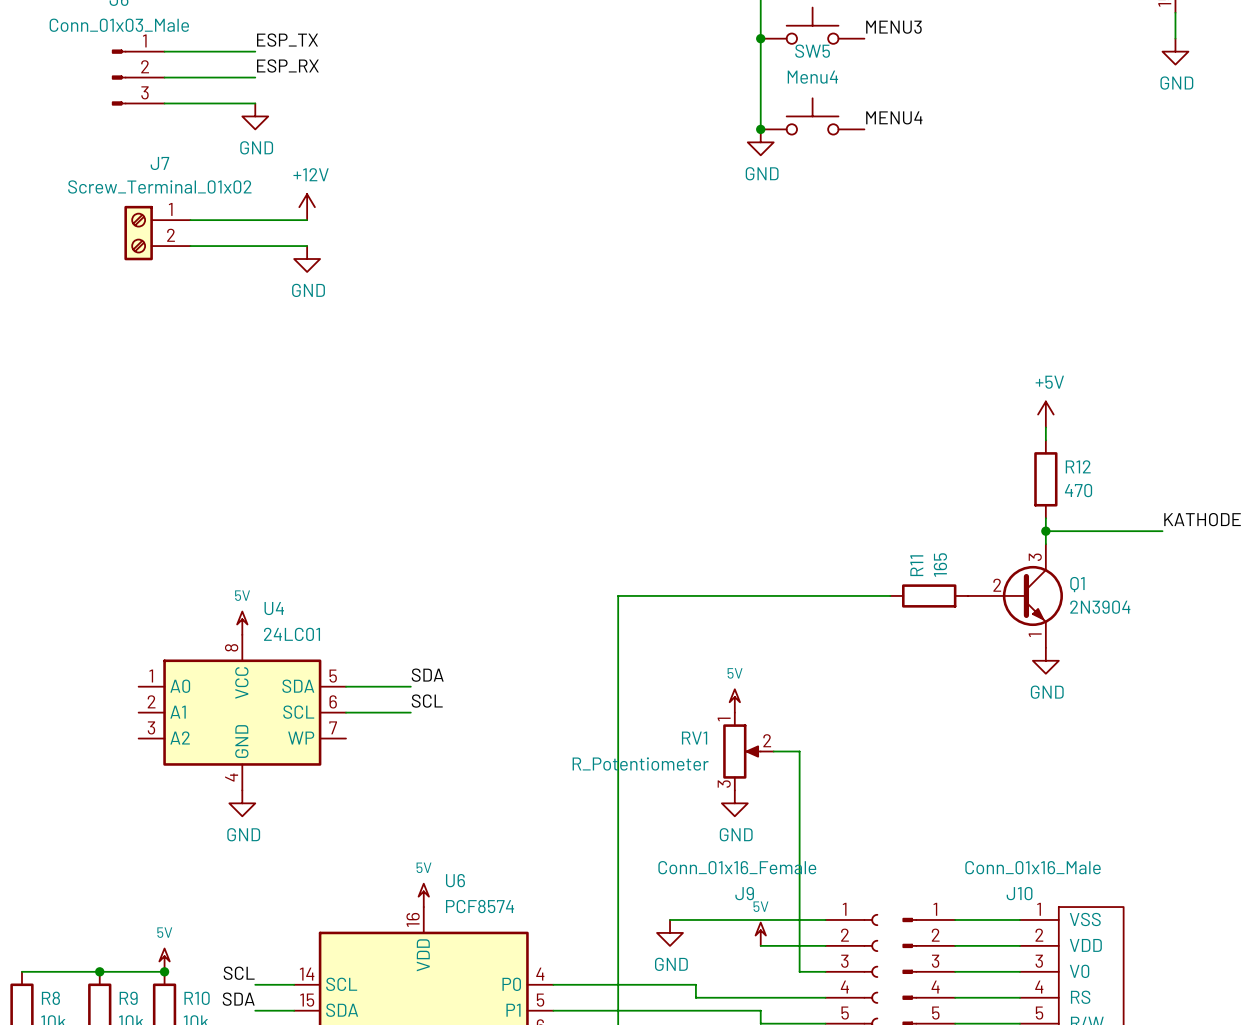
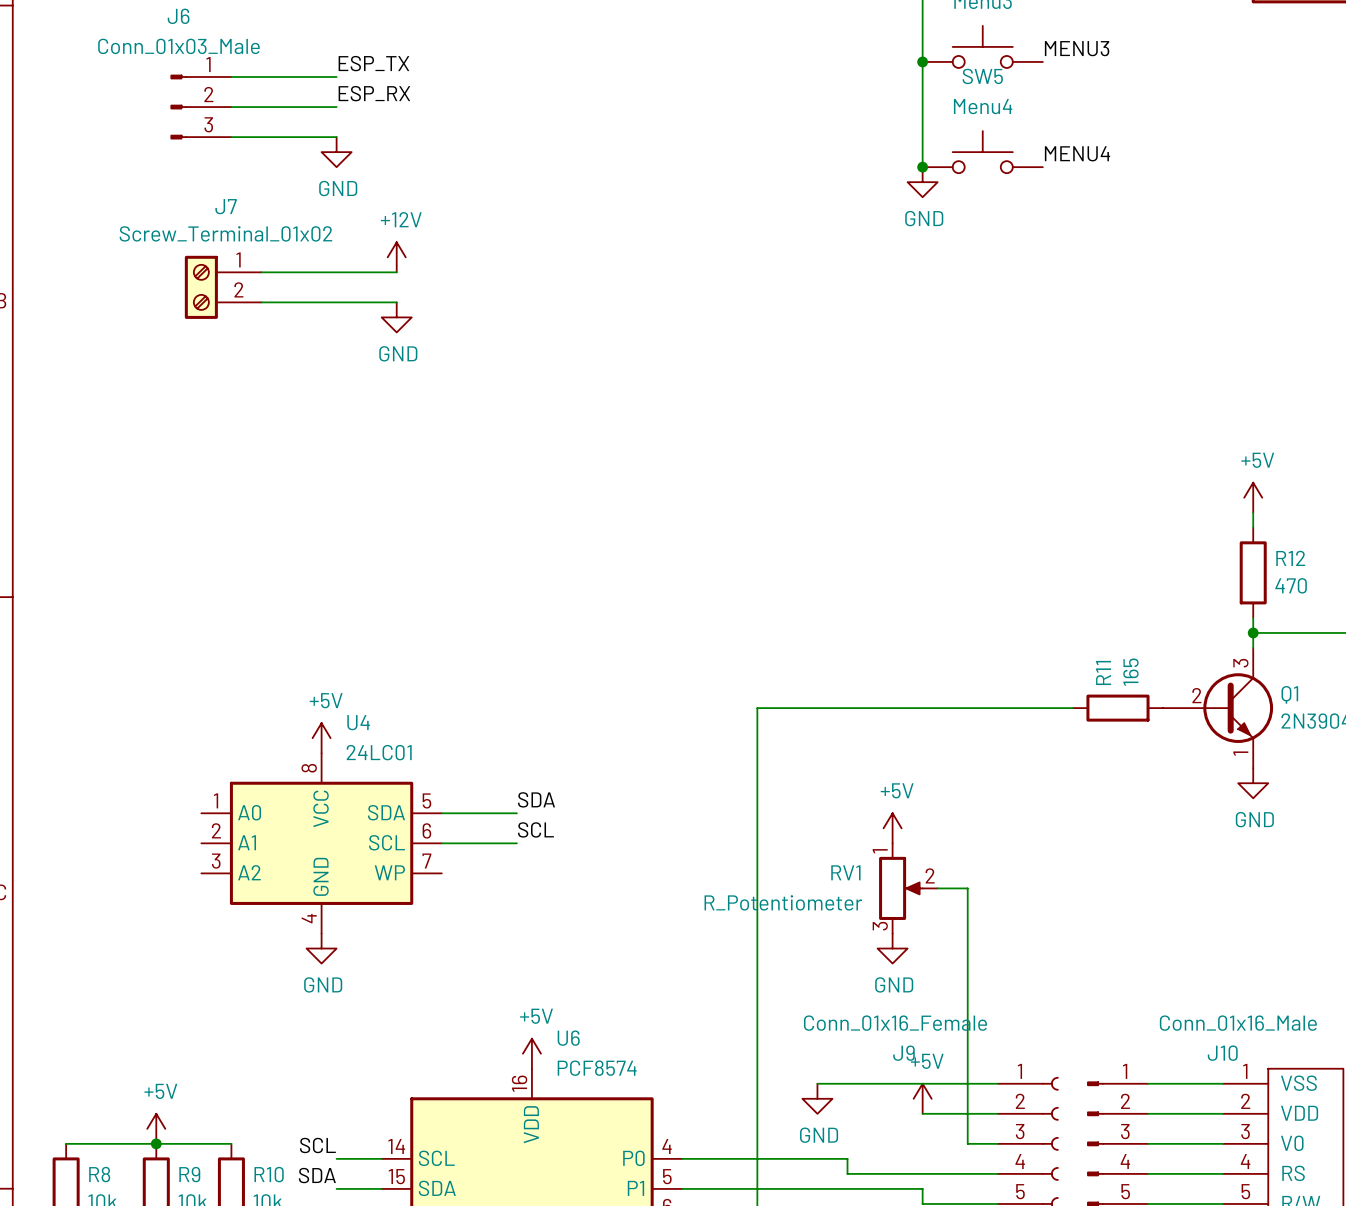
power symbol: 5V (242, 623) -> +5V (321, 738)
power symbol: 5V (734, 700) -> +5V (892, 828)
power symbol: 5V (423, 895) -> +5V (531, 1053)
power symbol: 5V (760, 934) -> +5V (922, 1098)
power symbol: none -> +5V (156, 1128)
power symbol: 5V (164, 960) -> none
junction: (164, 971) -> none

